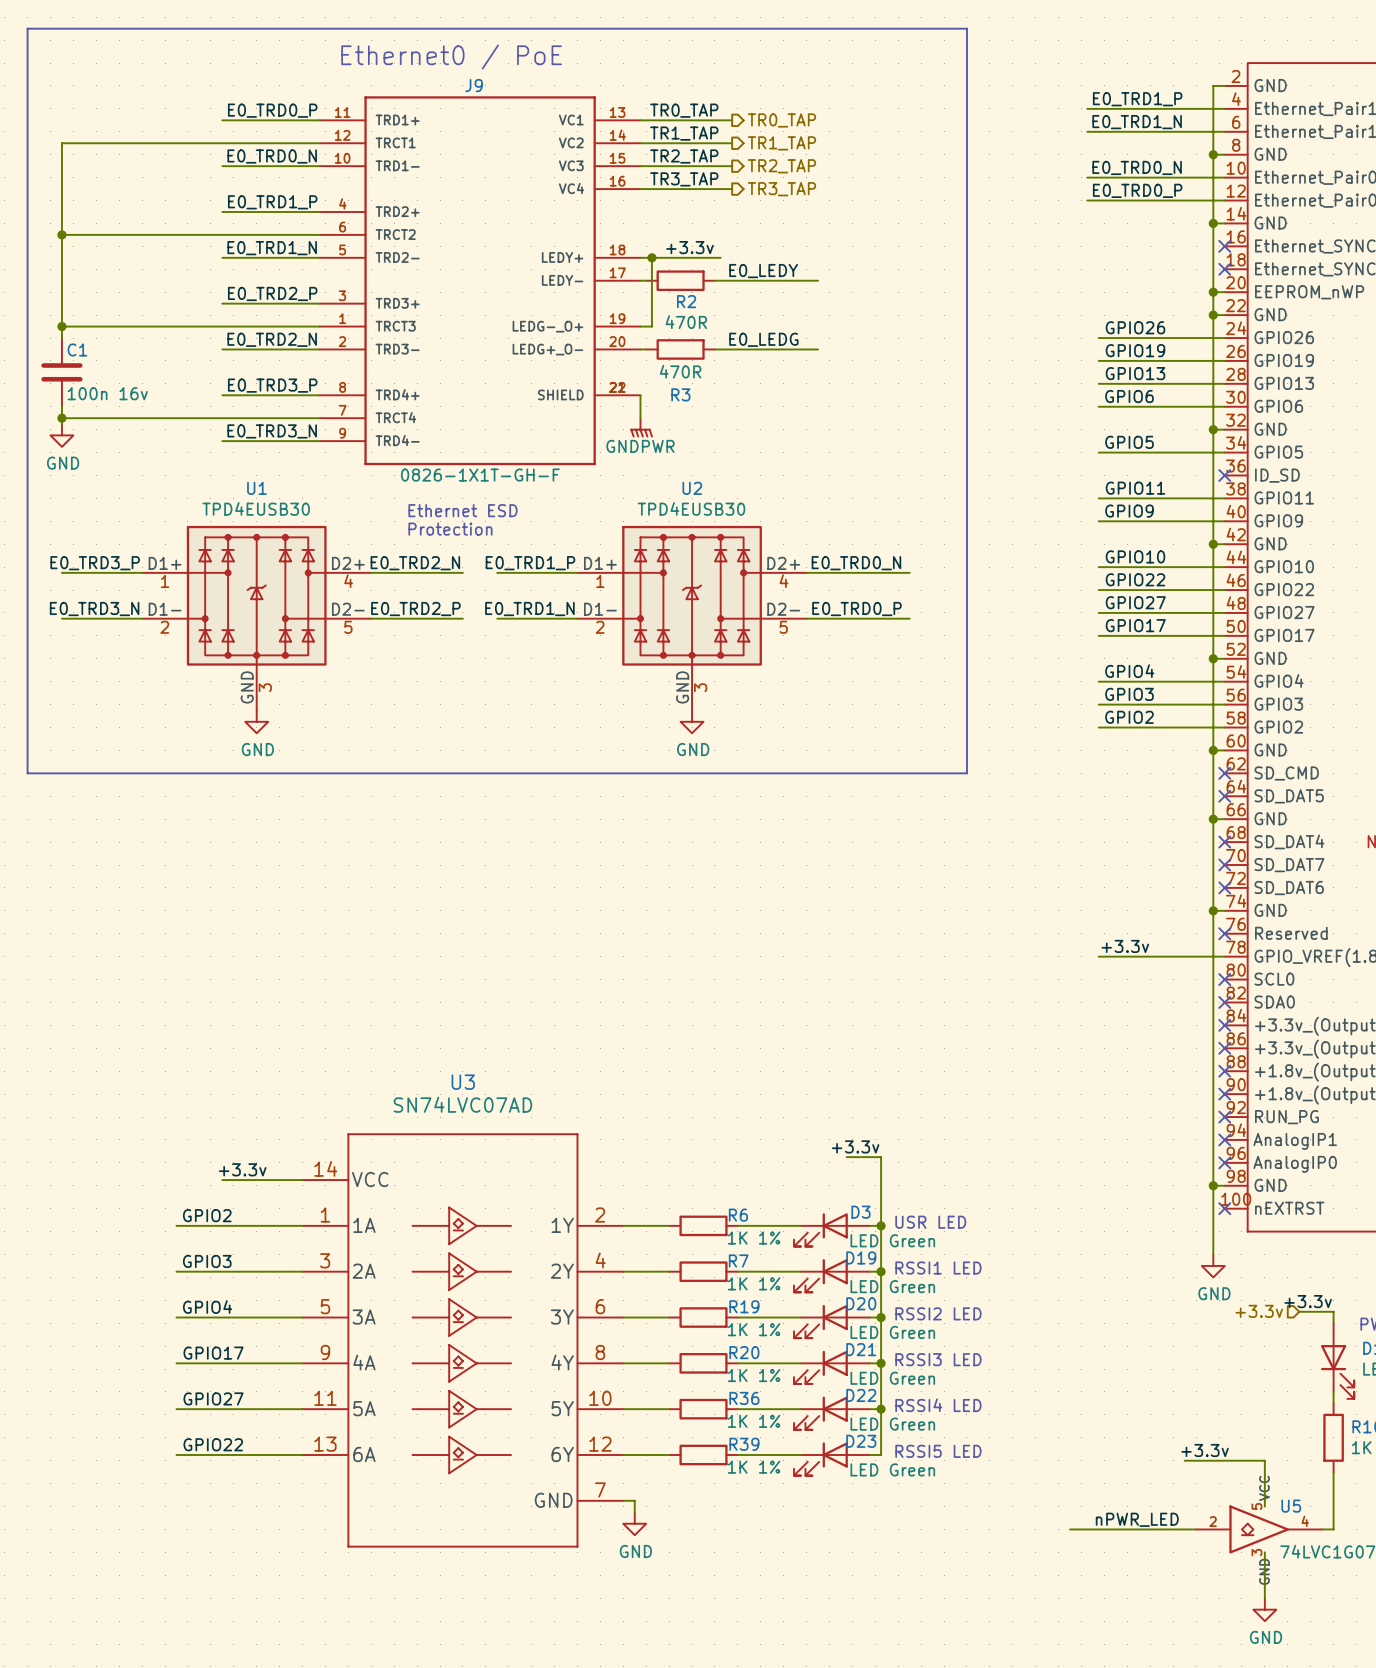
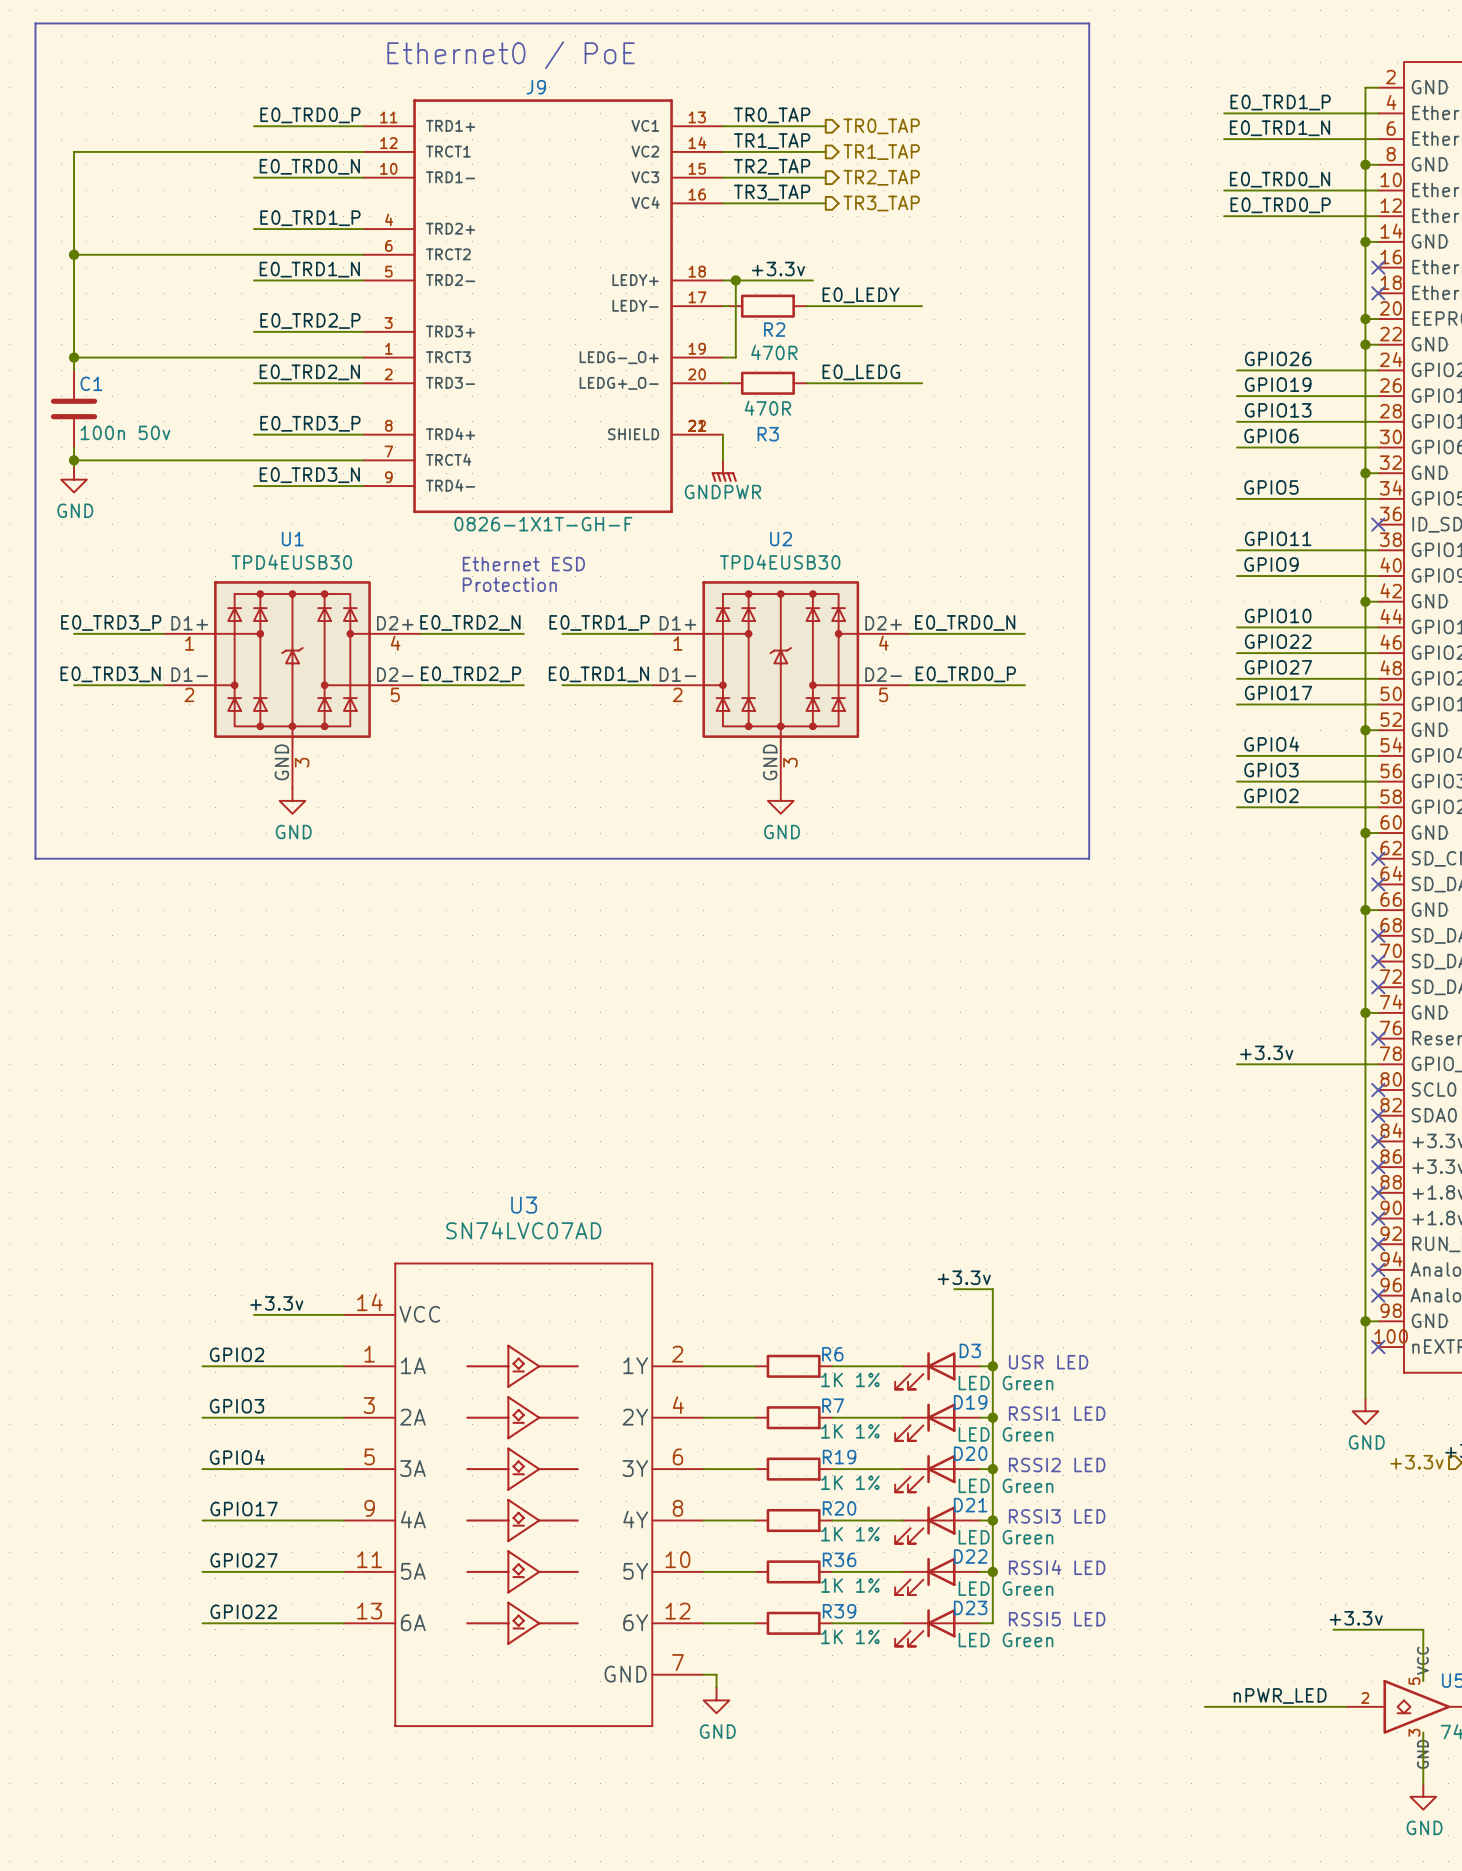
C1 value: 100n 16v (107, 393) -> 100n 50v (125, 432)

